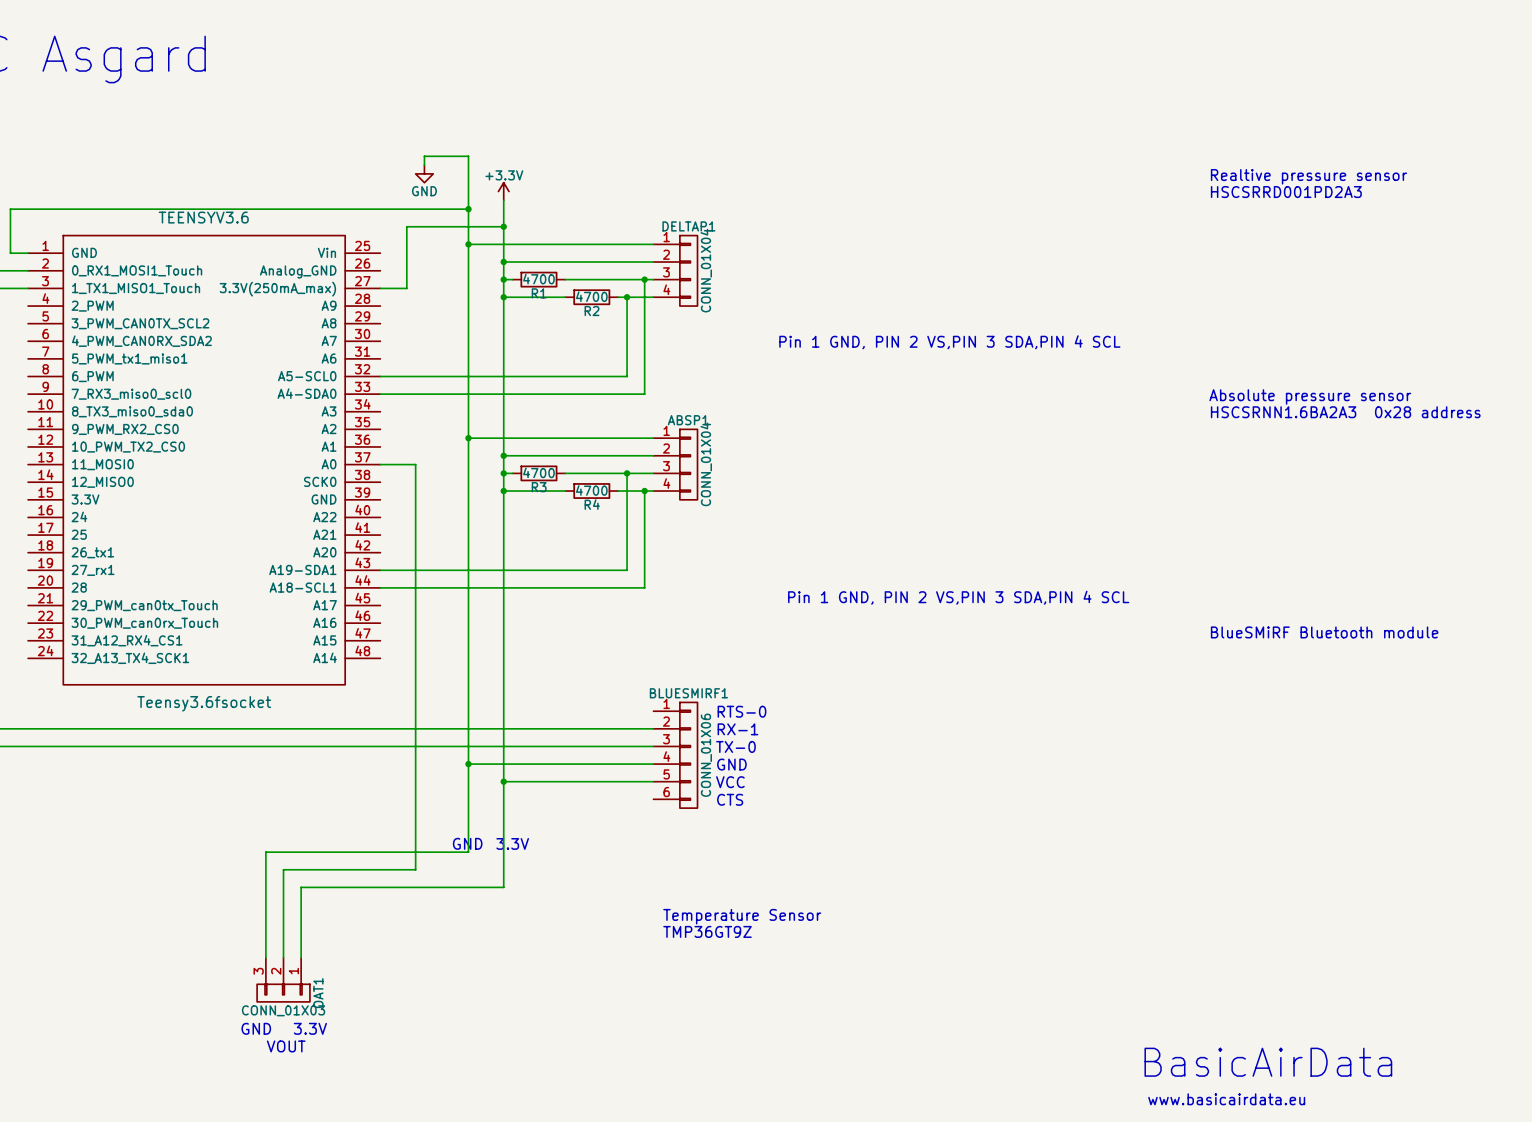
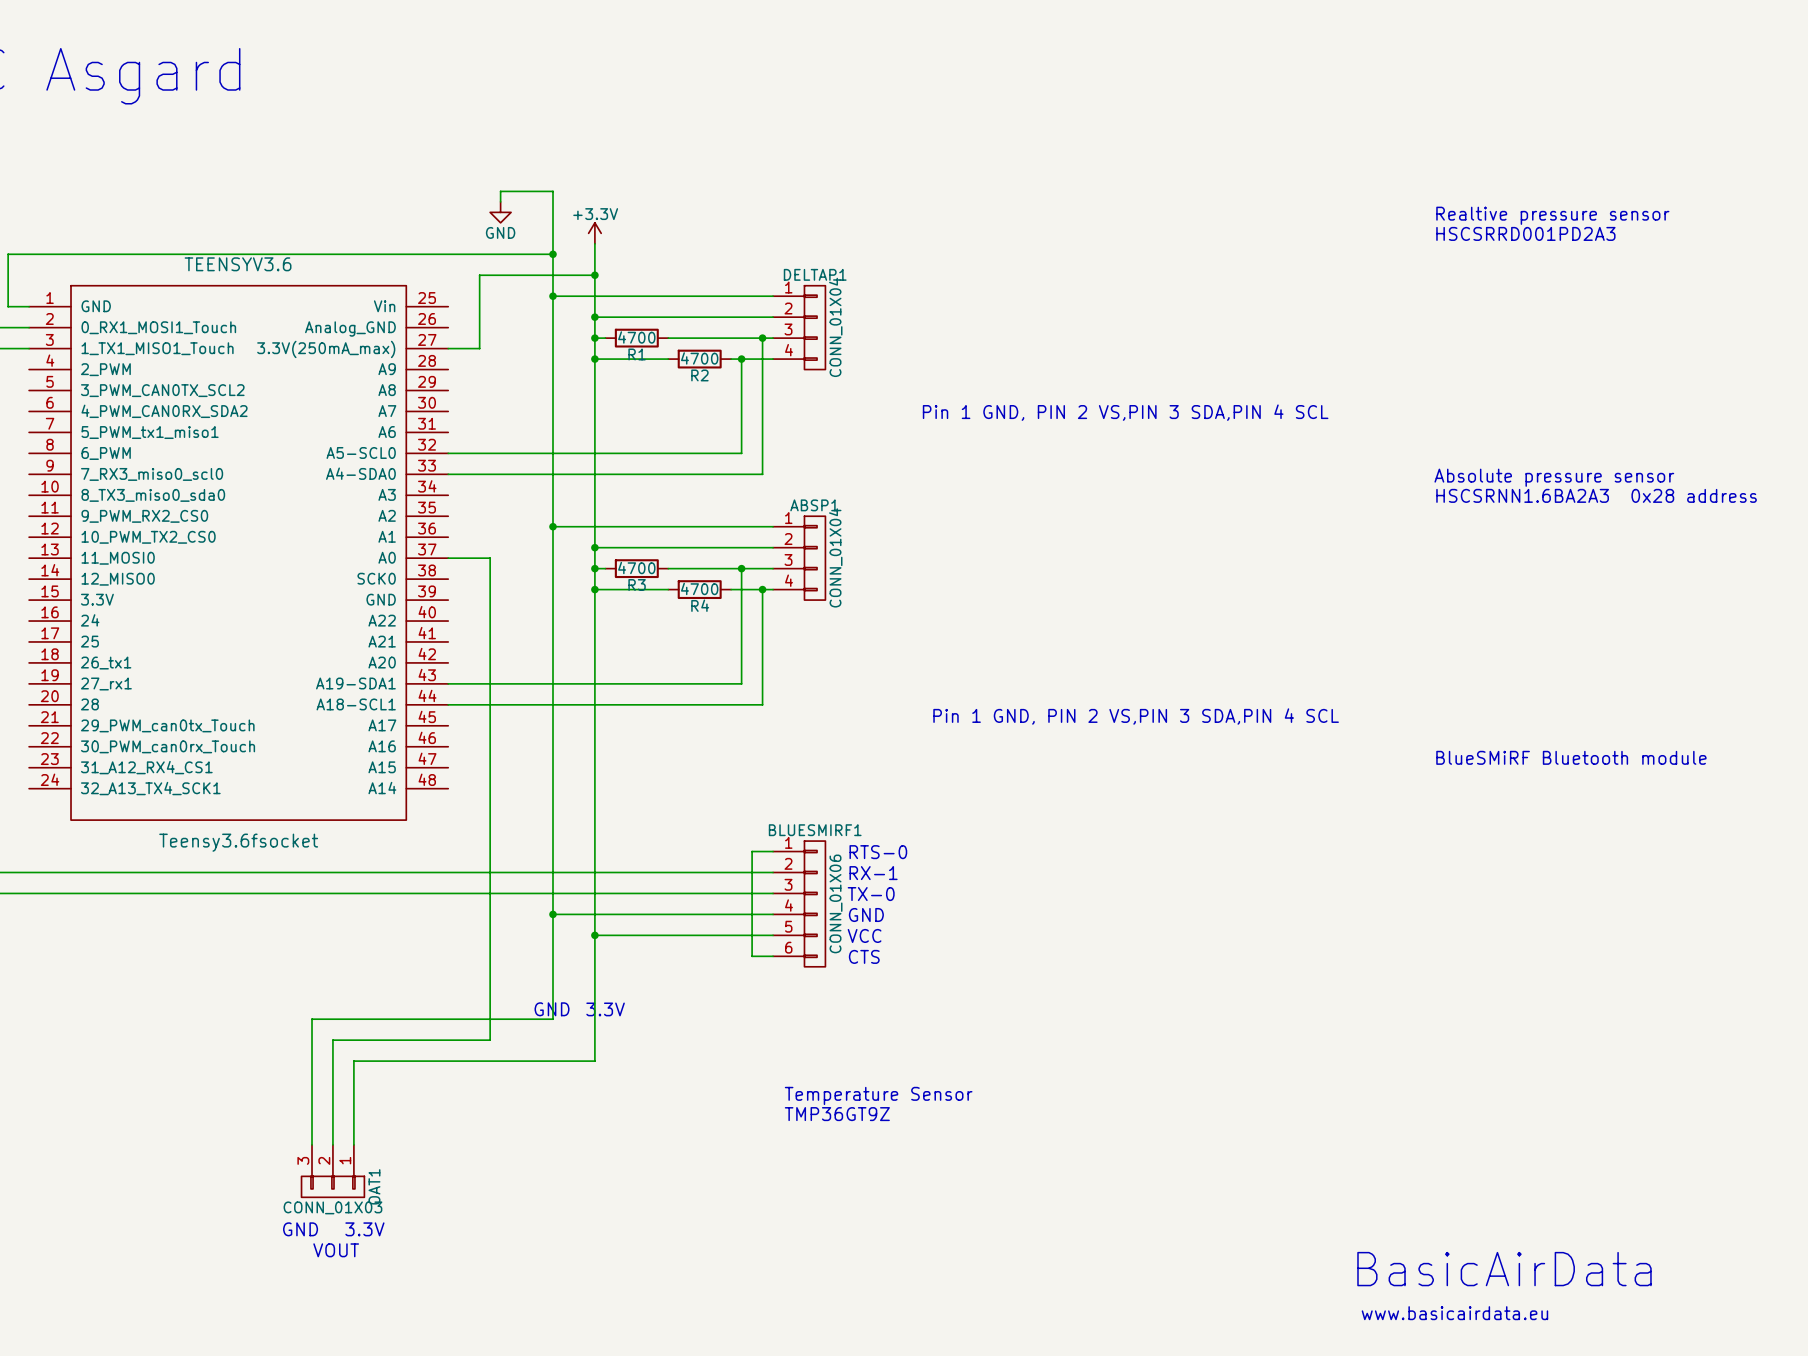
wire: none -> (773, 851) (752, 851) (752, 956) (773, 956)

